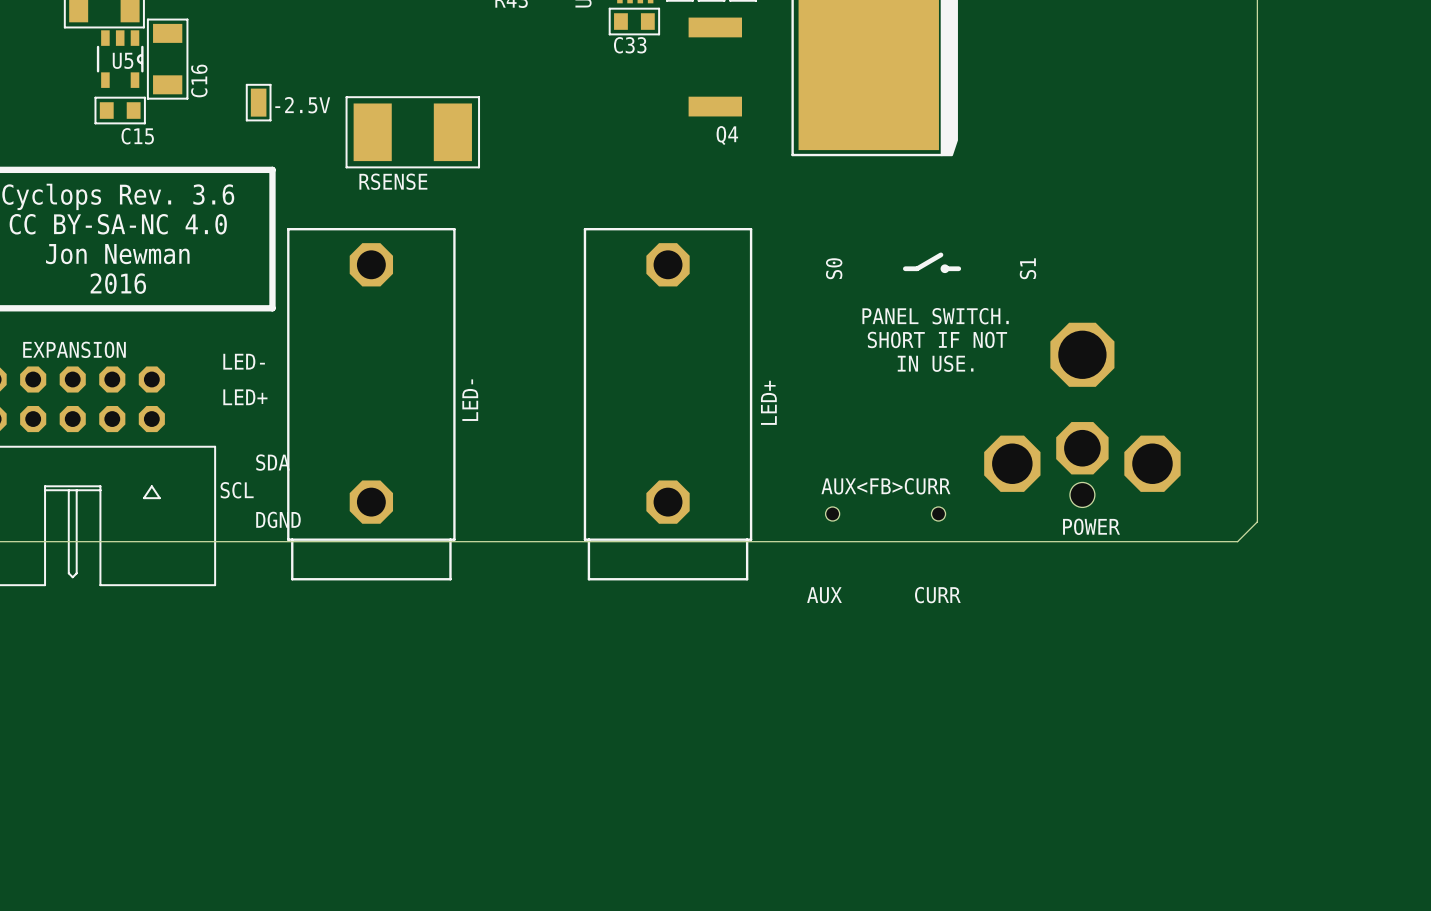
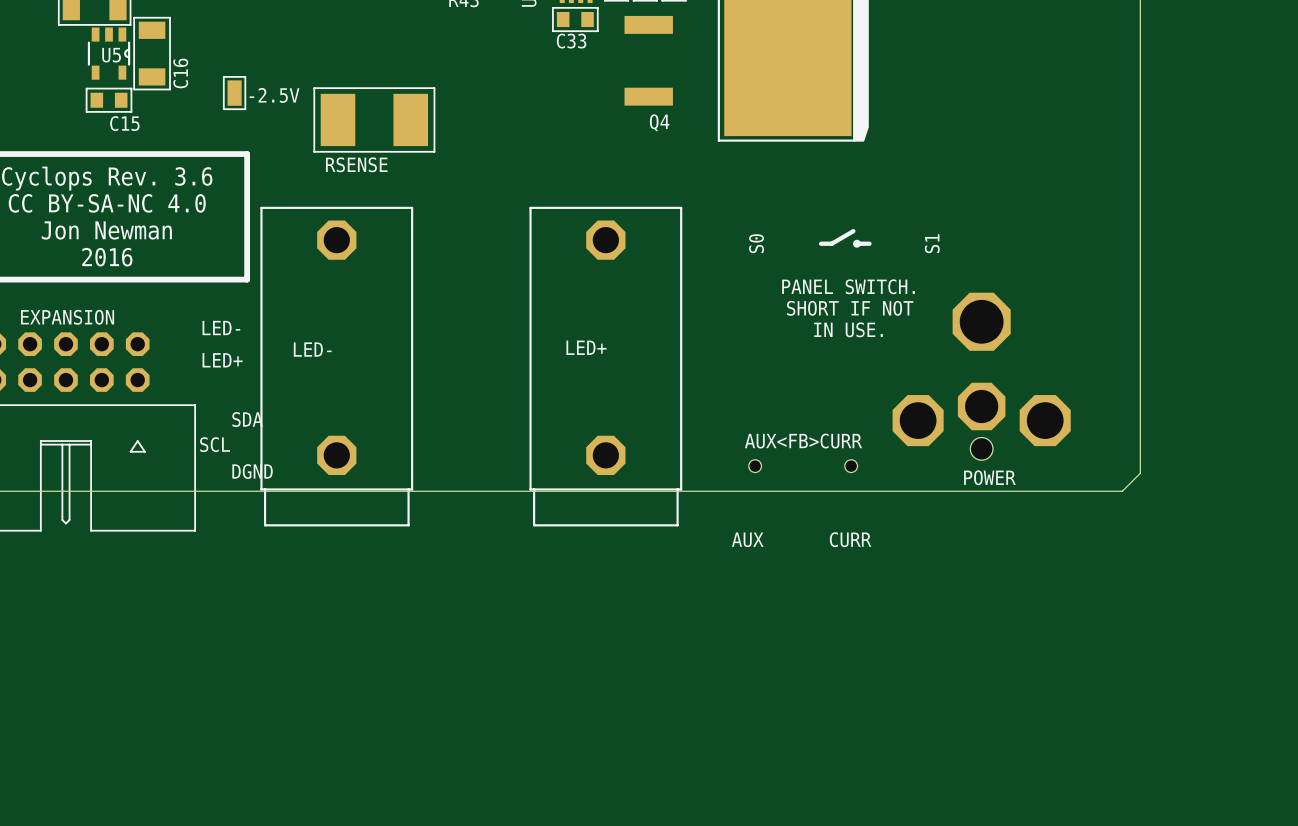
LED- name rotation: 0° (470, 400) -> 90° clockwise (312, 349)
LED- name position: LED- (470, 400) -> LED- (312, 349)
LED+ name rotation: 0° (768, 402) -> 90° clockwise (586, 347)
LED+ name position: LED+ (768, 402) -> LED+ (586, 347)

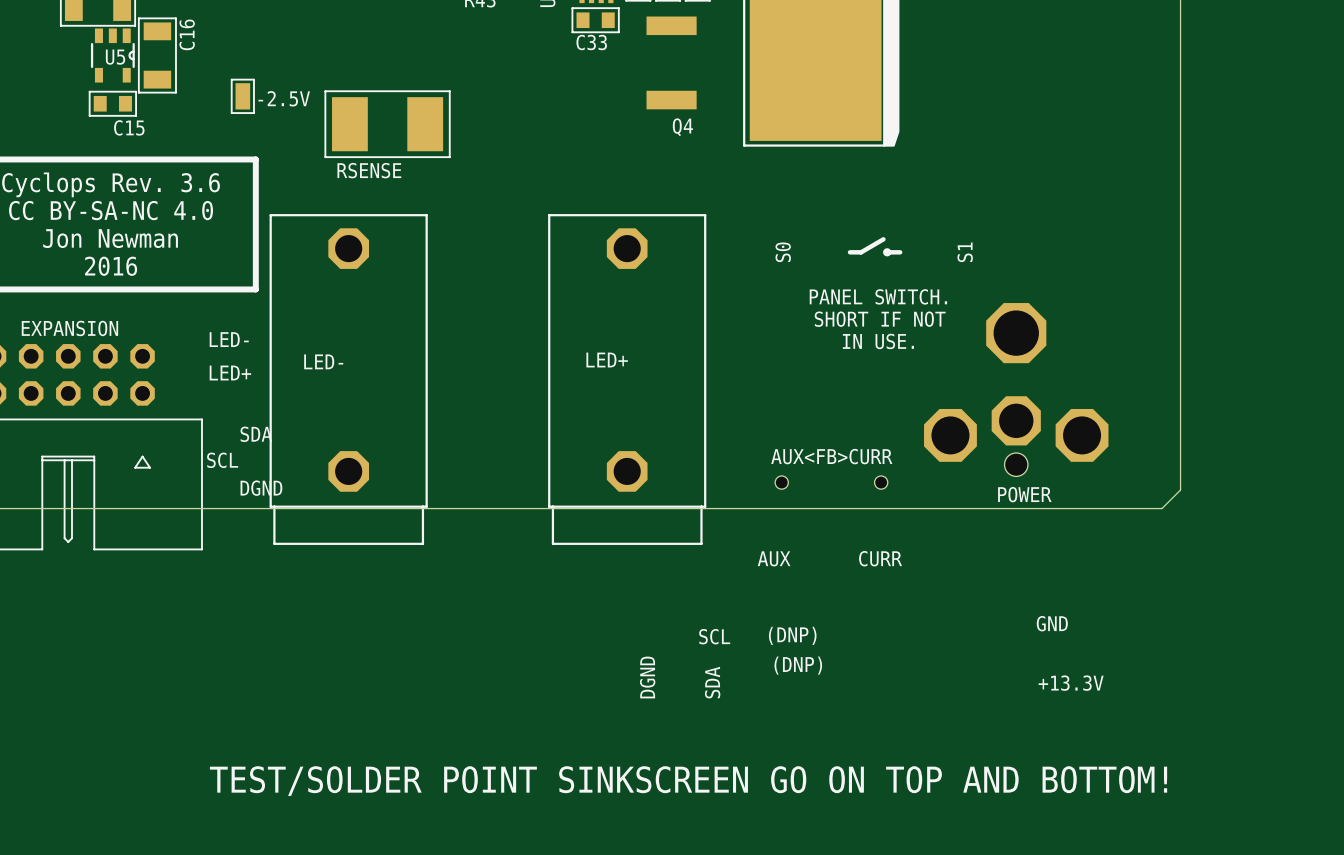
C16 name position: C16 (180, 73) -> C16 (187, 34)
text: none -> GND (1052, 623)
text: none -> (DNP) (792, 635)
text: none -> SCL (714, 636)
text: none -> (DNP) (798, 665)
text: none -> DGND (647, 677)
text: none -> SDA (712, 682)
text: none -> +13.3V (1071, 683)
text: none -> TEST/SOLDER POINT SINKSCREEN GO ON TOP AND BOTTOM! (688, 781)

